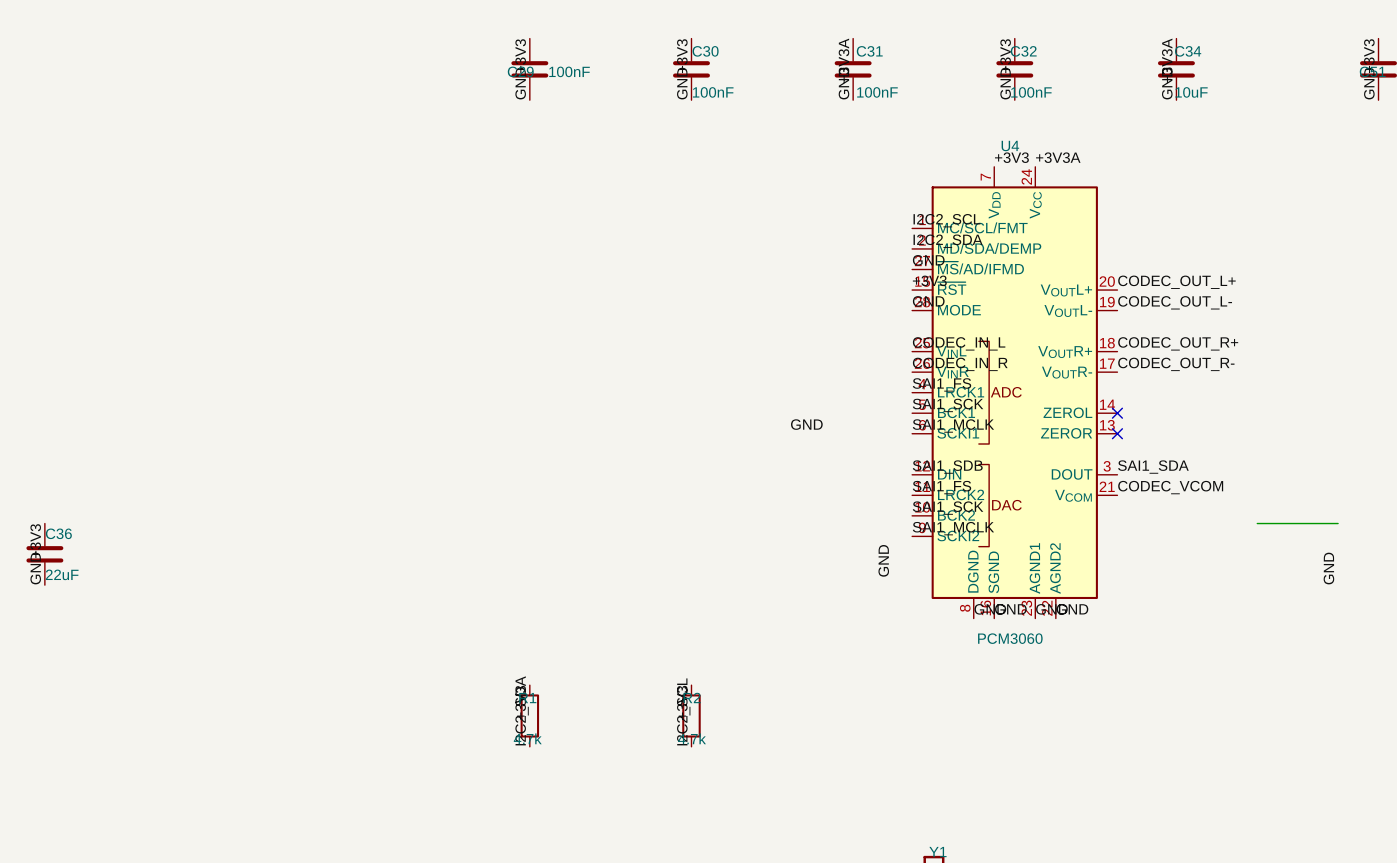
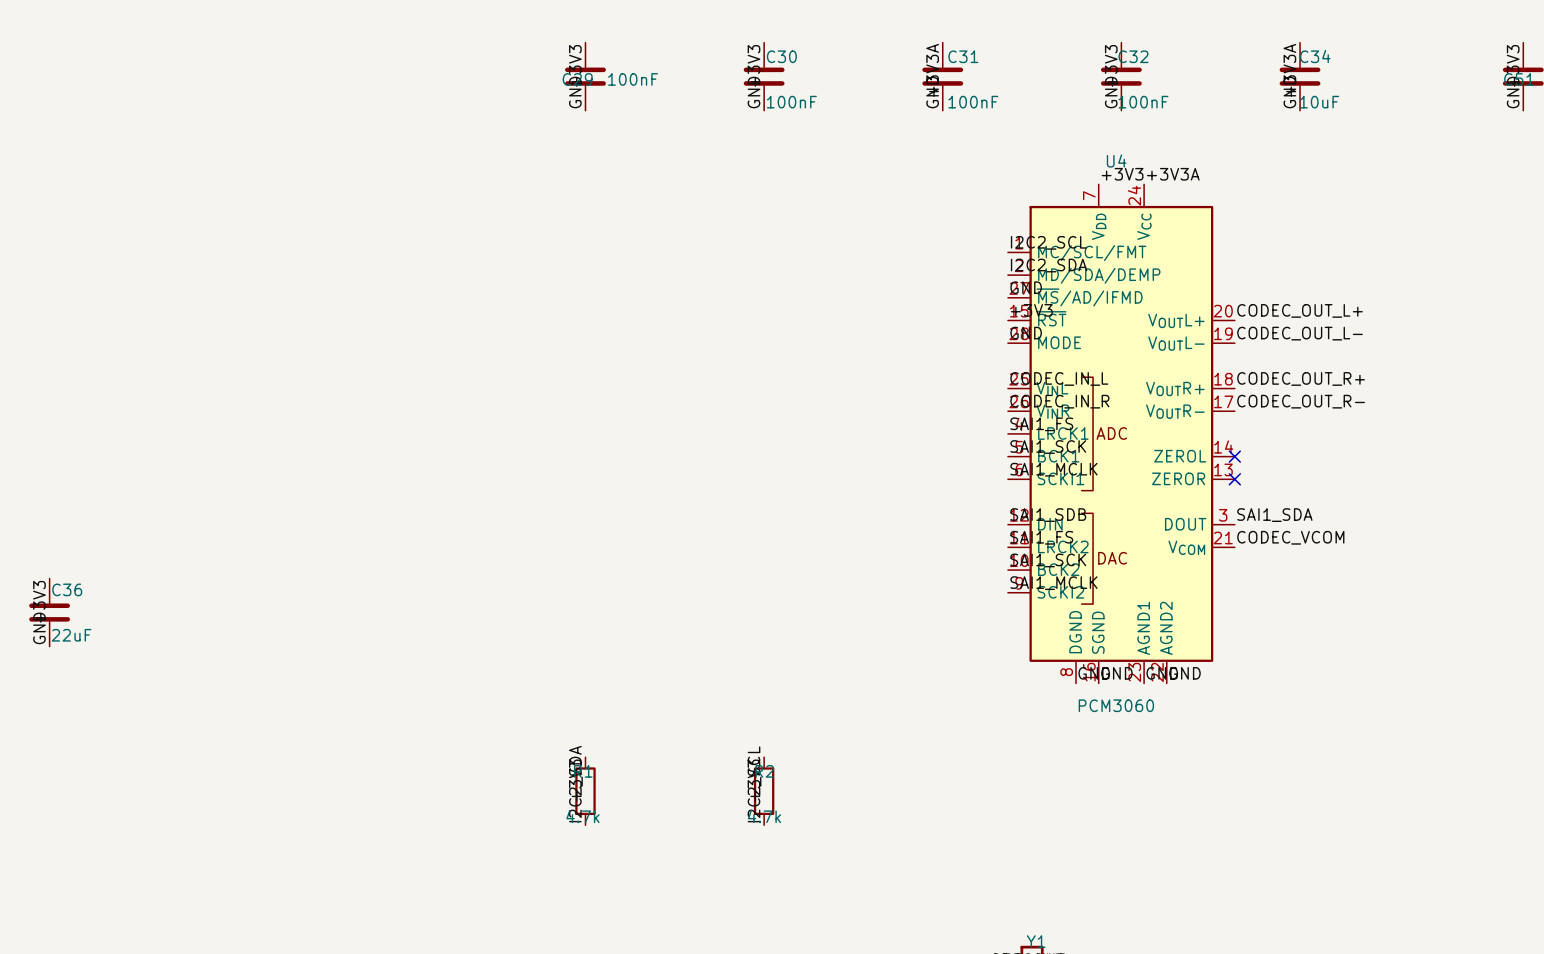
label: GND (806, 424) -> none
wire: (1257, 523) (1338, 523) -> none
label: GND (883, 560) -> none
label: GND (1328, 568) -> none

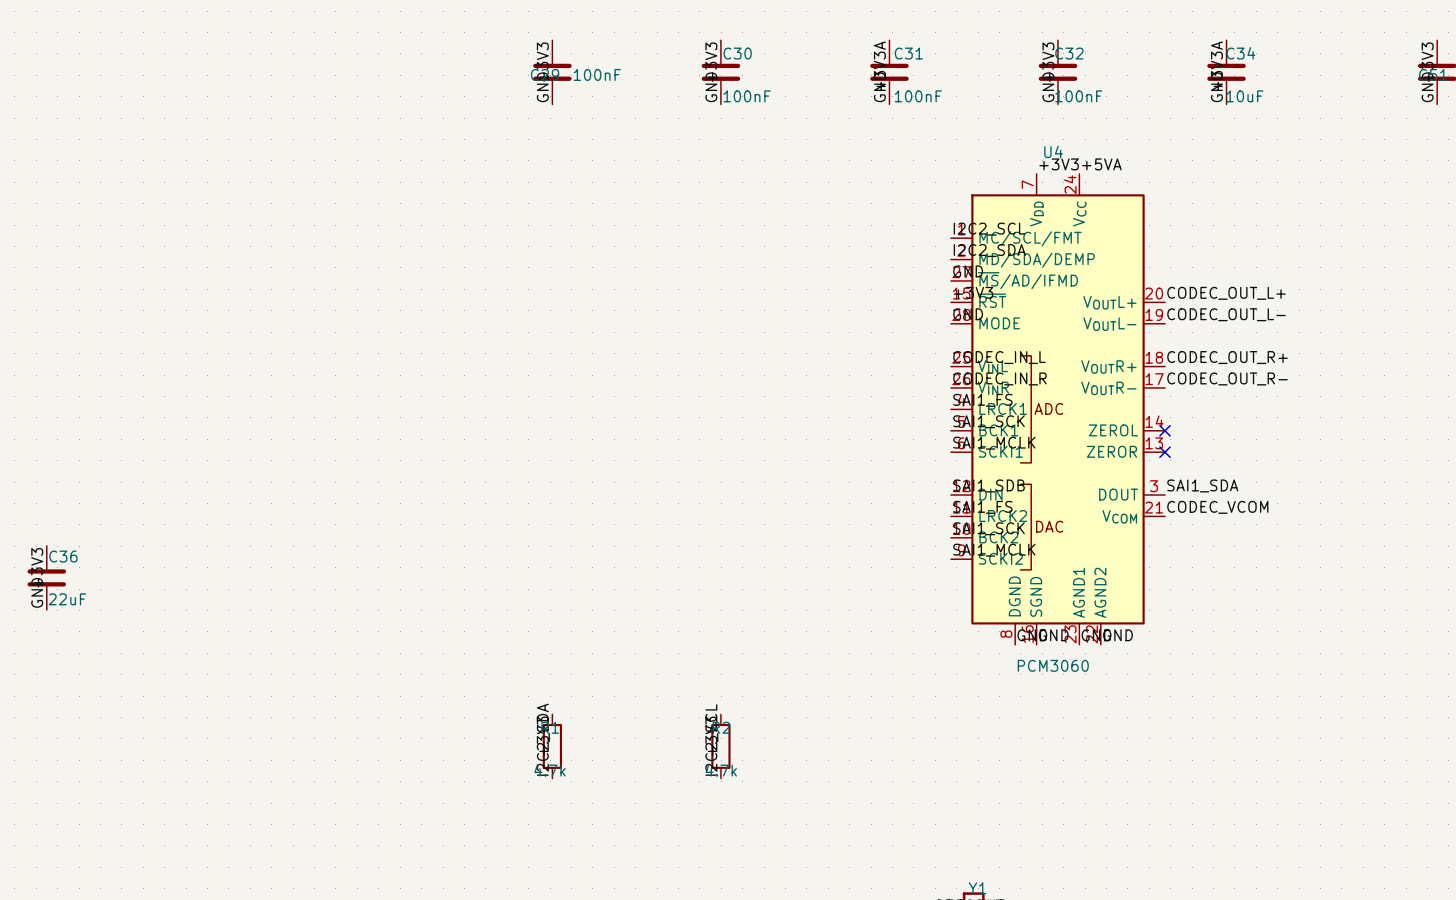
label: +3V3A (1173, 174) -> +5VA (1101, 164)

